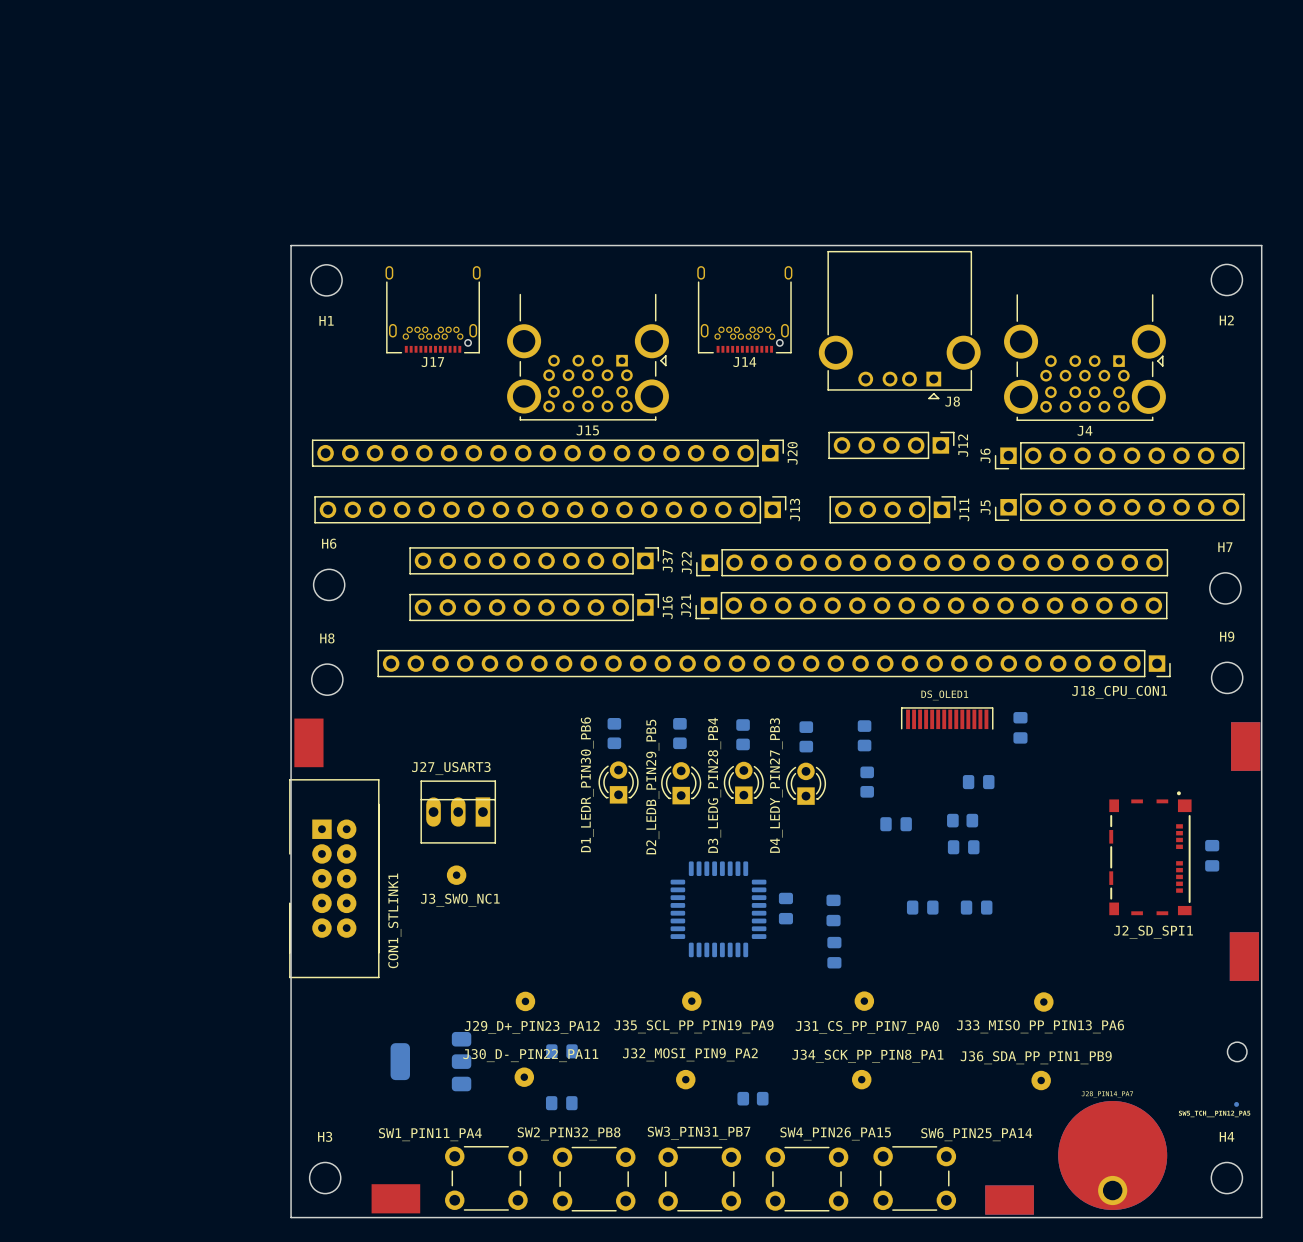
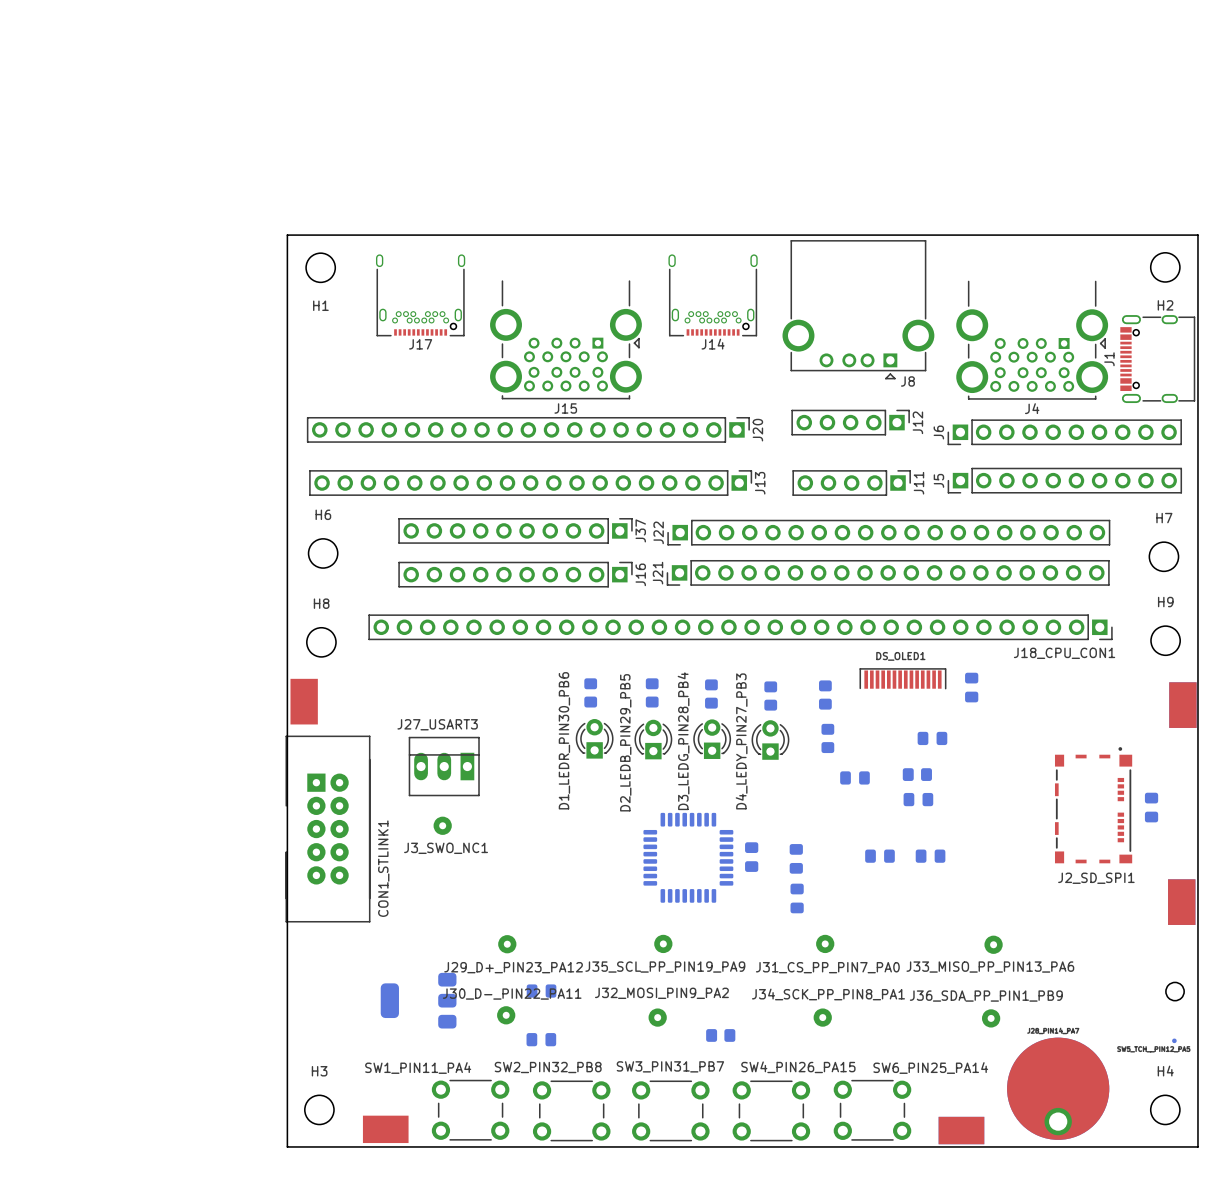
J1: none -> (1157, 359)

